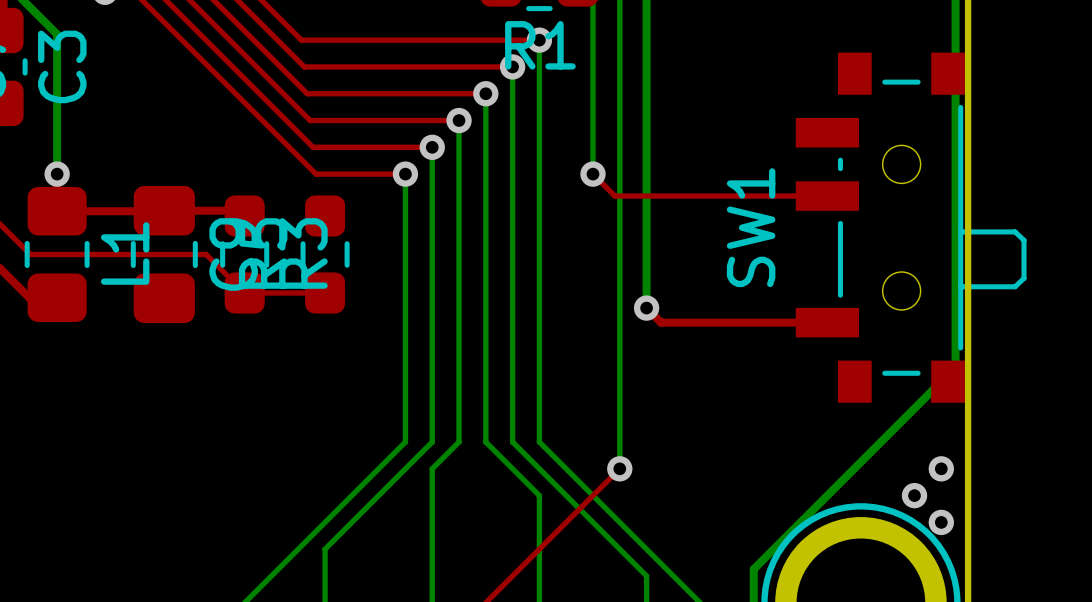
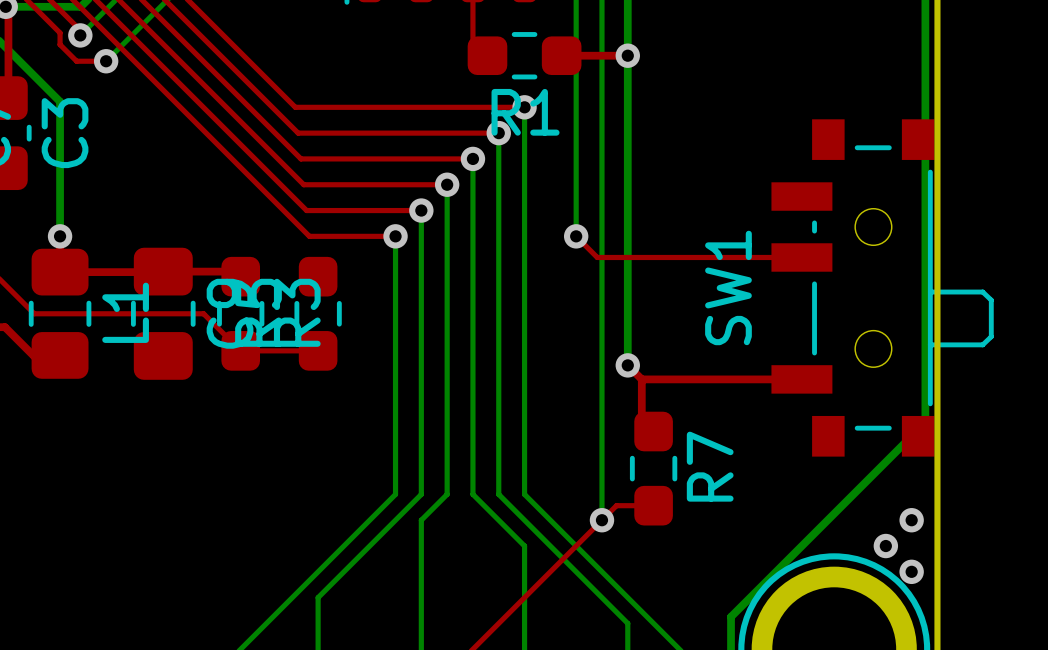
top track: none -> (641, 379) (641, 419) (653, 431)
R7: none -> (653, 468)
top track: none -> (653, 505) (616, 505) (601, 520)

